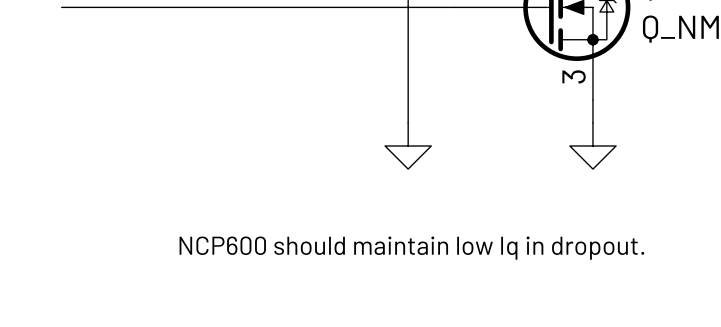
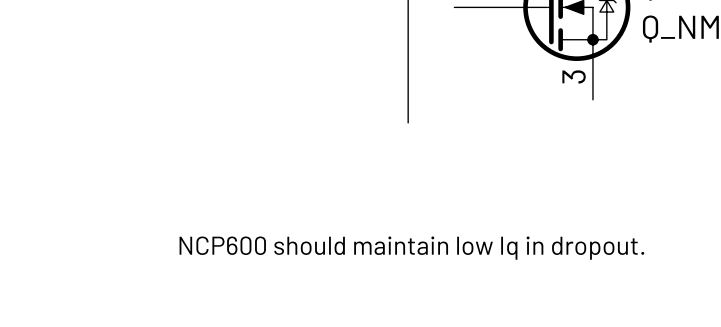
wire: (61, 7) (454, 7) -> none
wire: (592, 99) (592, 122) -> none
power symbol: (408, 146) -> none
power symbol: (592, 146) -> none

